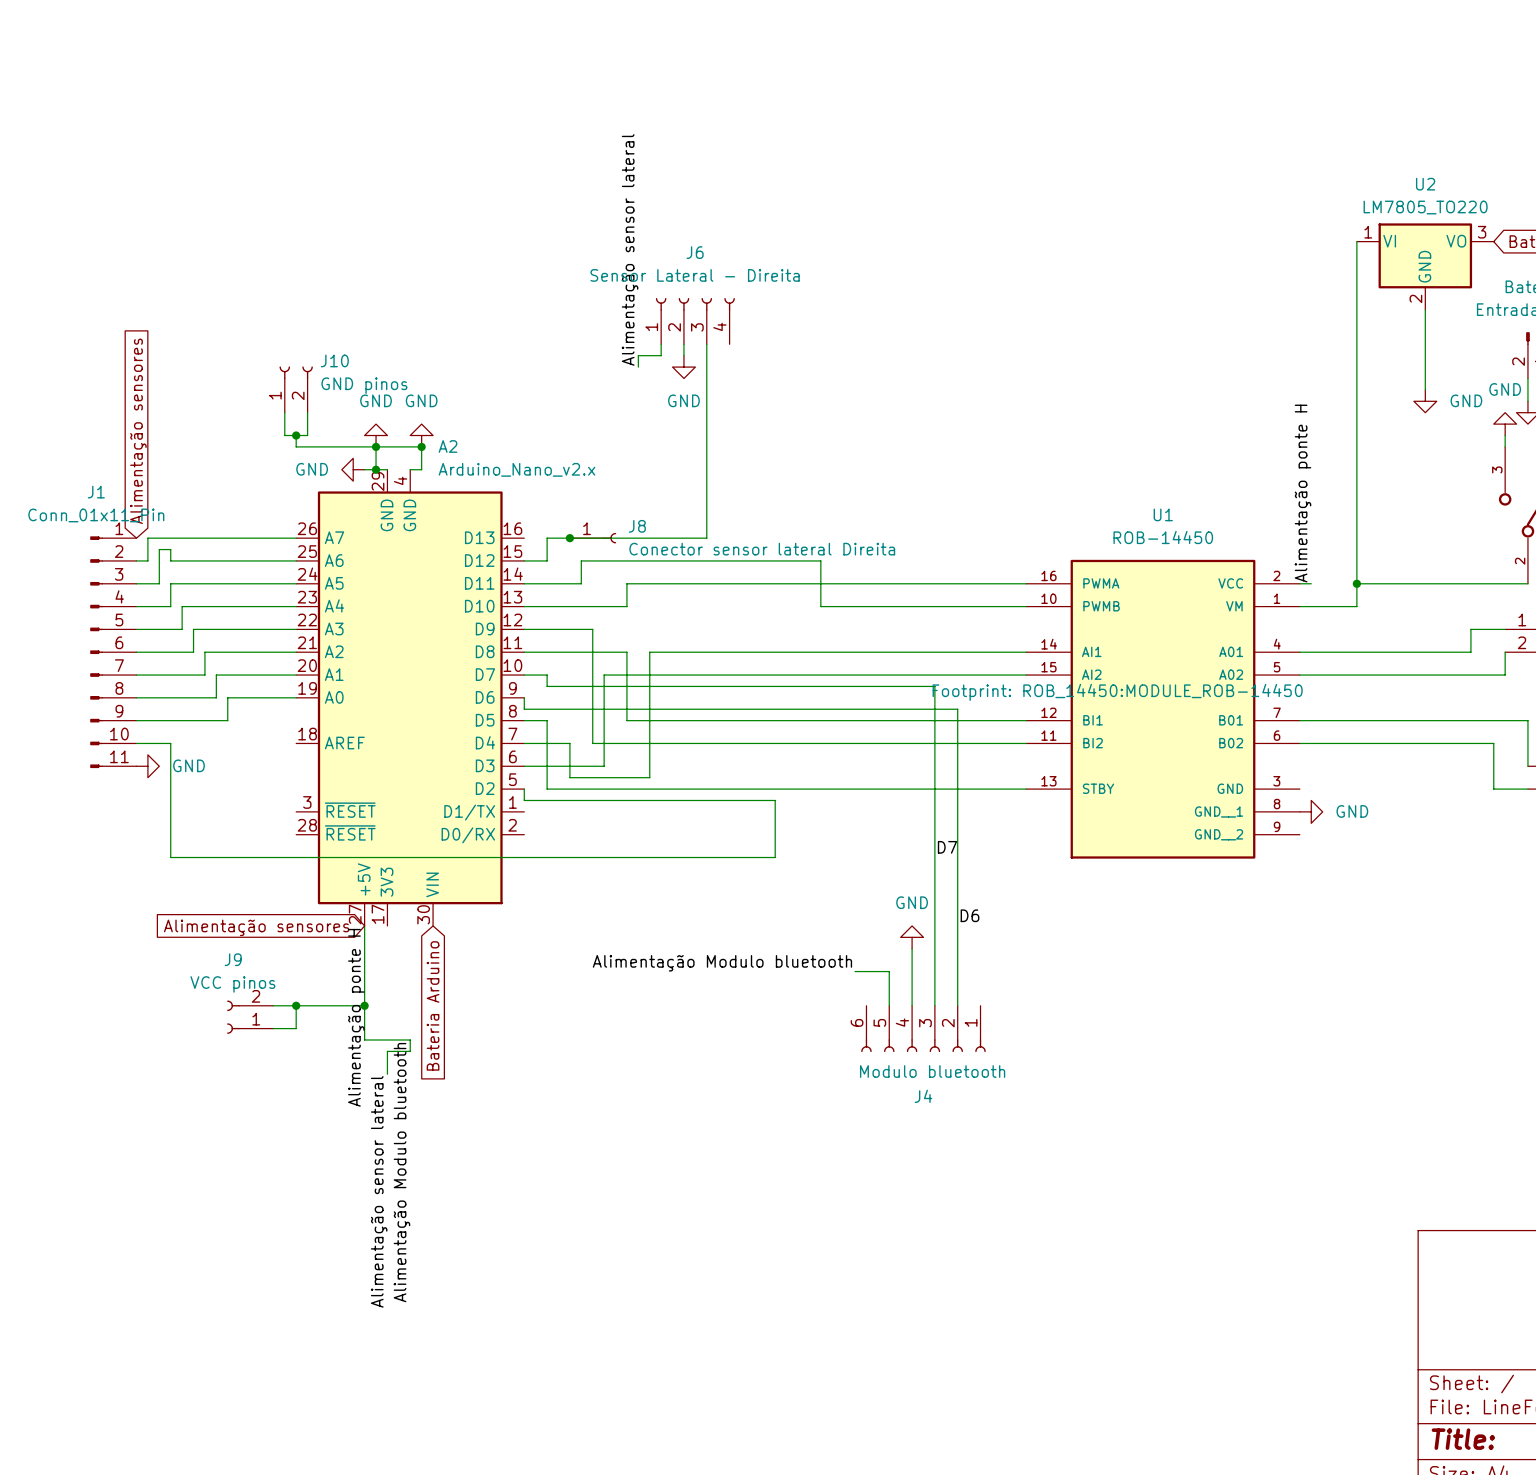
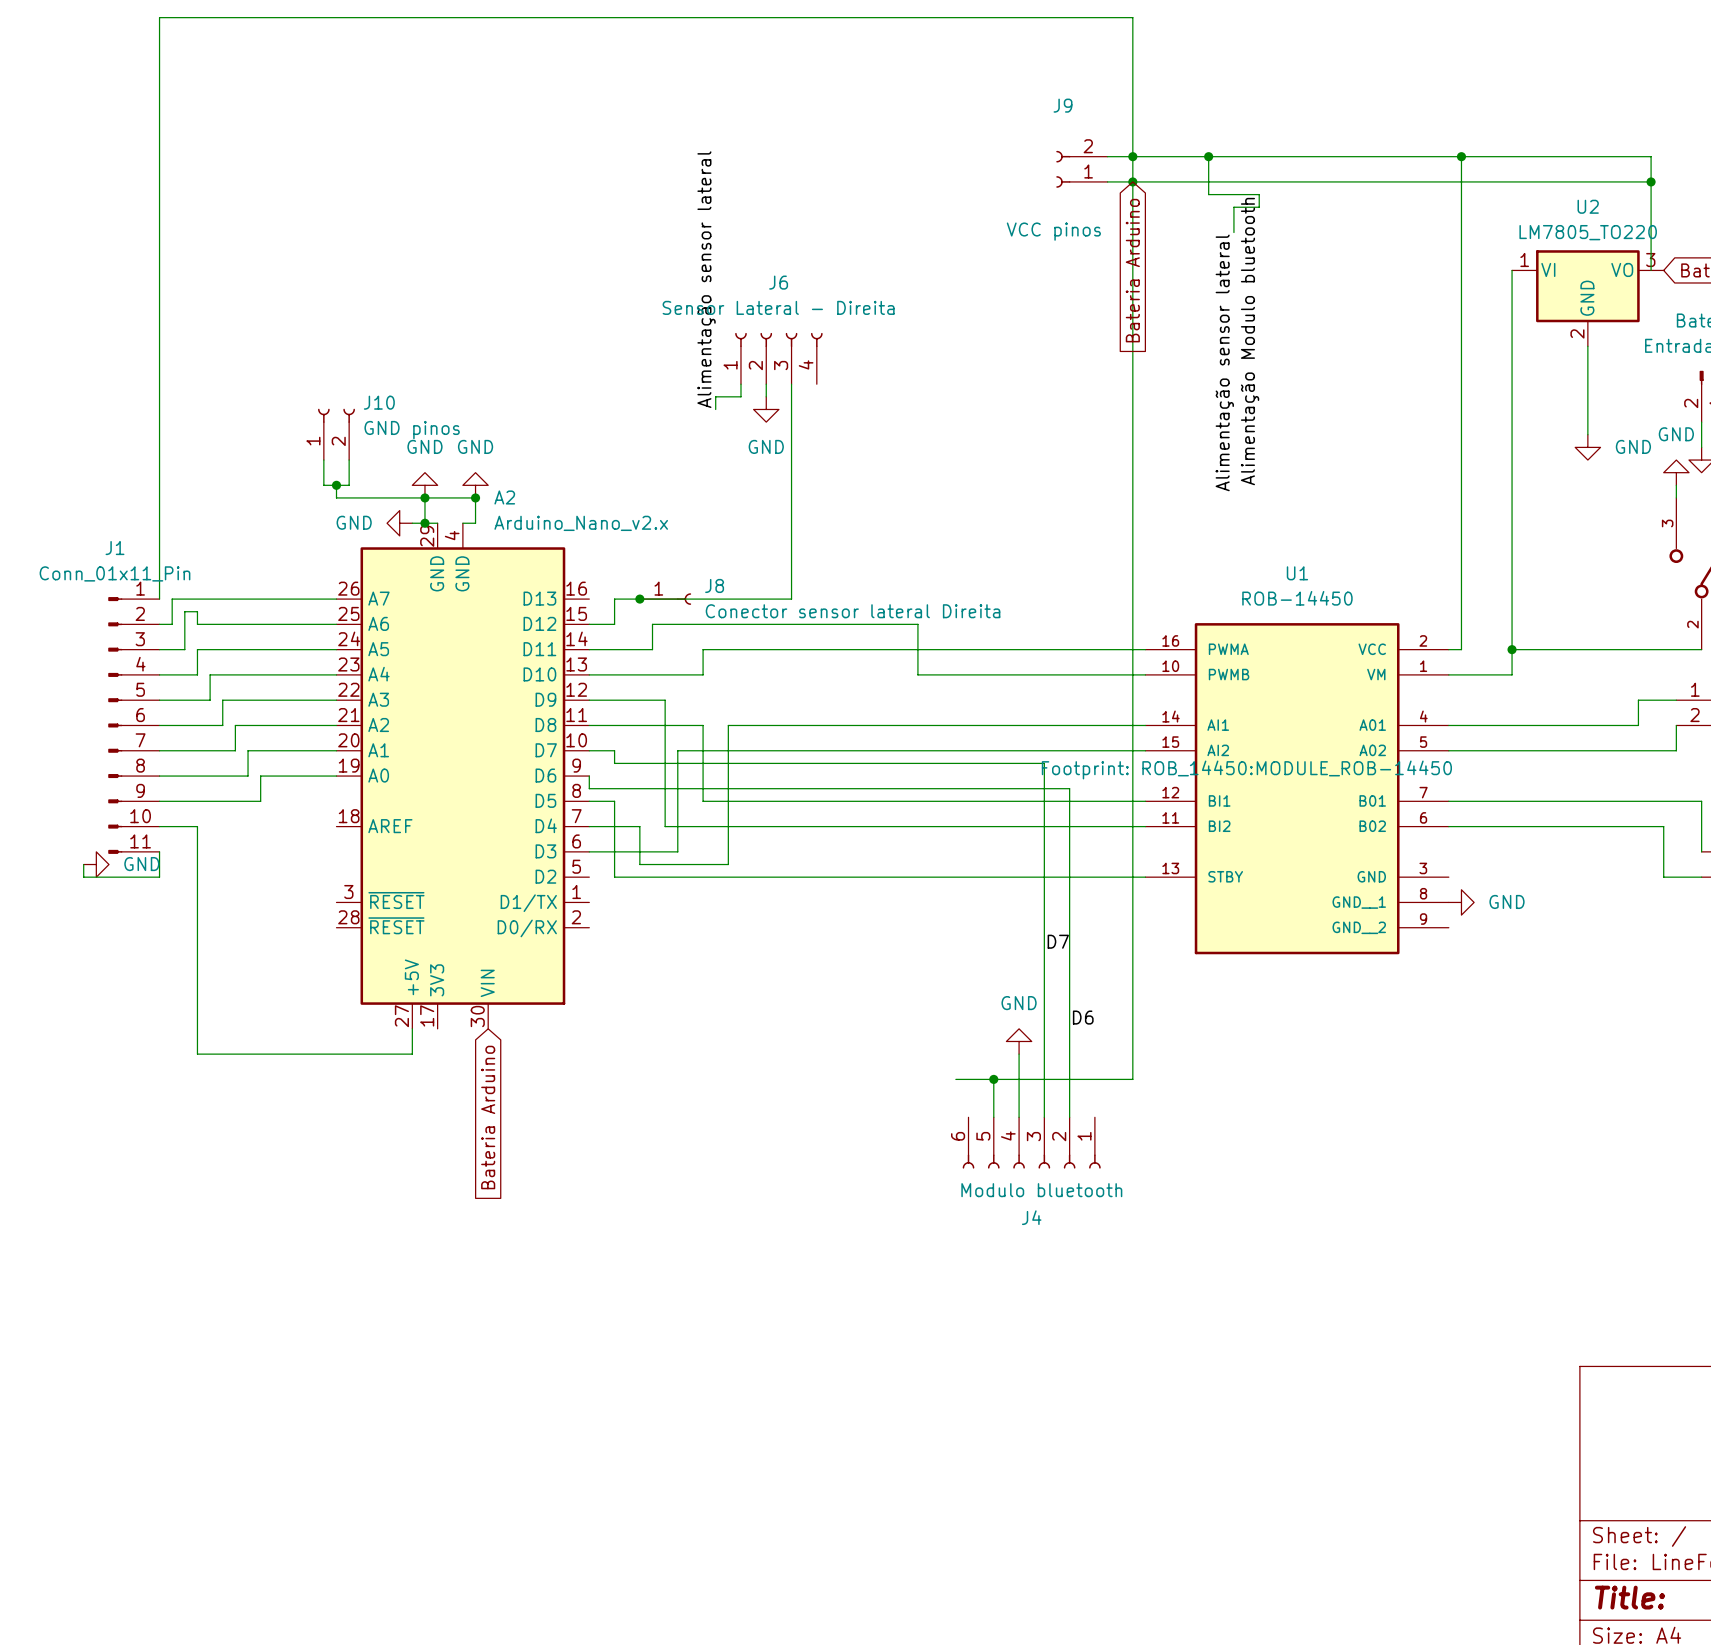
wire: none -> (1107, 156) (1651, 156) (1651, 270)
junction: none -> (1132, 156)
wire: none -> (1208, 156) (1208, 194) (1259, 194) (1259, 207) (1233, 207) (1233, 232)
junction: none -> (1208, 156)
wire: none -> (1461, 156) (1461, 649)
junction: none -> (1461, 156)
wire: none -> (1107, 181) (1651, 181)
junction: none -> (1132, 181)
junction: none -> (1651, 181)
global label: none -> Bateria Arduino (1132, 270)
label: none -> Alimentação Modulo bluetooth (1250, 341)
label: none -> Alimentação sensor lateral (1224, 362)
global label: Alimentação sensores (138, 431) -> none
label: Alimentação ponte H (1302, 493) -> none
wire: none -> (159, 599) (159, 17) (1132, 17) (1132, 1079) (993, 1079)
wire: none -> (159, 851) (159, 877) (83, 877) (83, 864)
power symbol position: GND (147, 766) -> GND (96, 864)
wire: (524, 789) (524, 800) (775, 800) (775, 857) (170, 857) -> (412, 1054) (197, 1054) (197, 953)
global label: Alimentação sensores (256, 927) -> none
wire: (364, 948) (364, 1039) (410, 1039) (410, 1051) (387, 1051) (387, 1074) -> none
label: Alimentação Modulo bluetooth (722, 963) -> none
junction: none -> (993, 1079)
J9 value position: VCC pinos (232, 984) -> VCC pinos (1053, 231)
wire: (273, 1005) (364, 1005) -> none
wire: (296, 1005) (296, 1028) (273, 1028) -> none
junction: (296, 1005) -> none
junction: (364, 1005) -> none
J9 position: (250, 1017) -> (1081, 169)
label: Alimentação ponte H (356, 1017) -> none
label: Alimentação Modulo bluetooth (401, 1172) -> none
label: Alimentação sensor lateral (379, 1191) -> none

